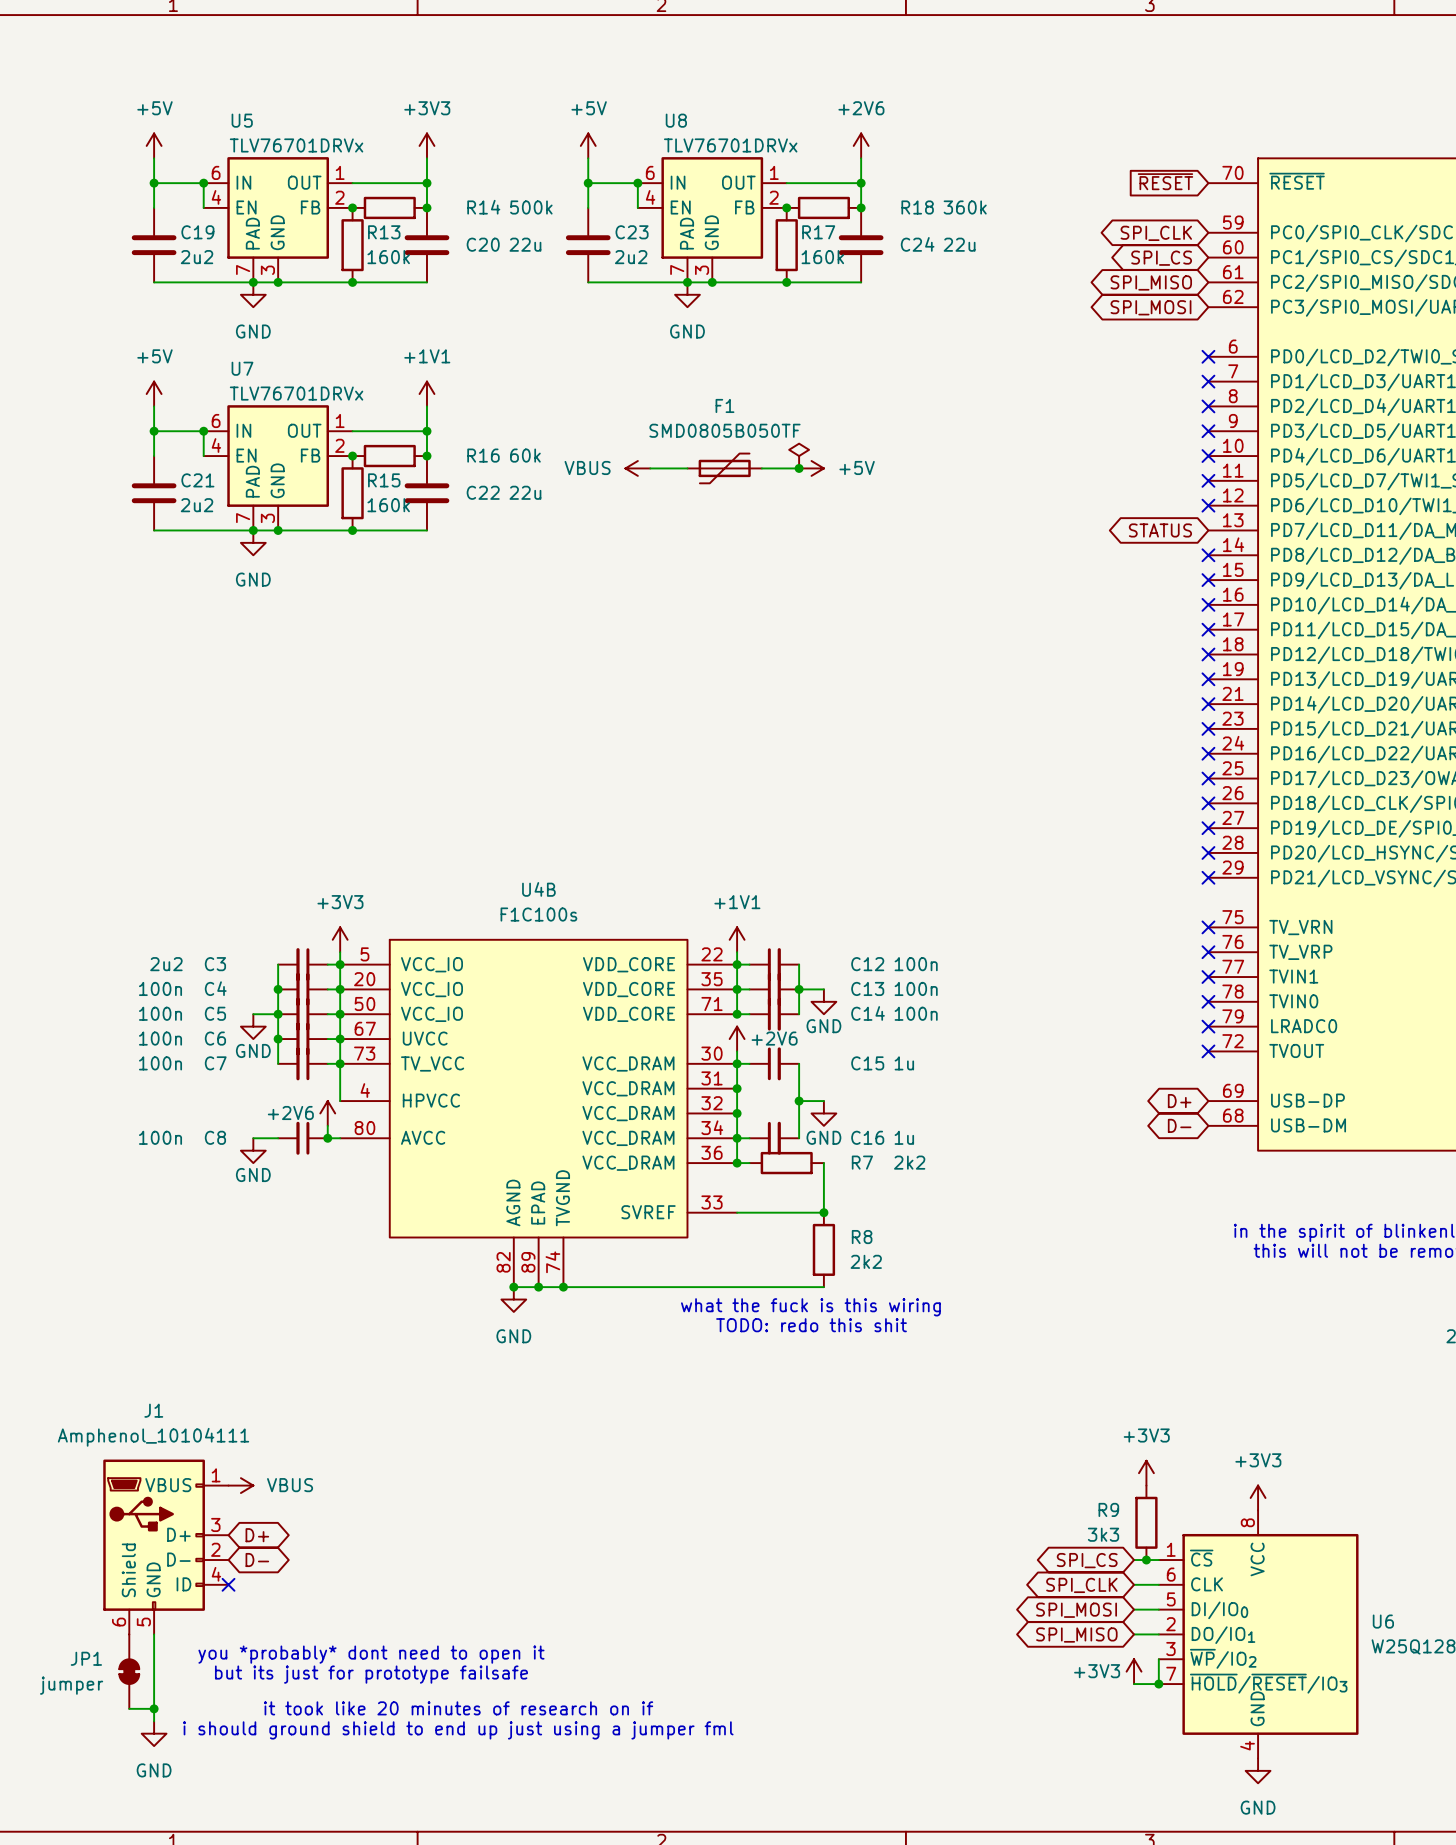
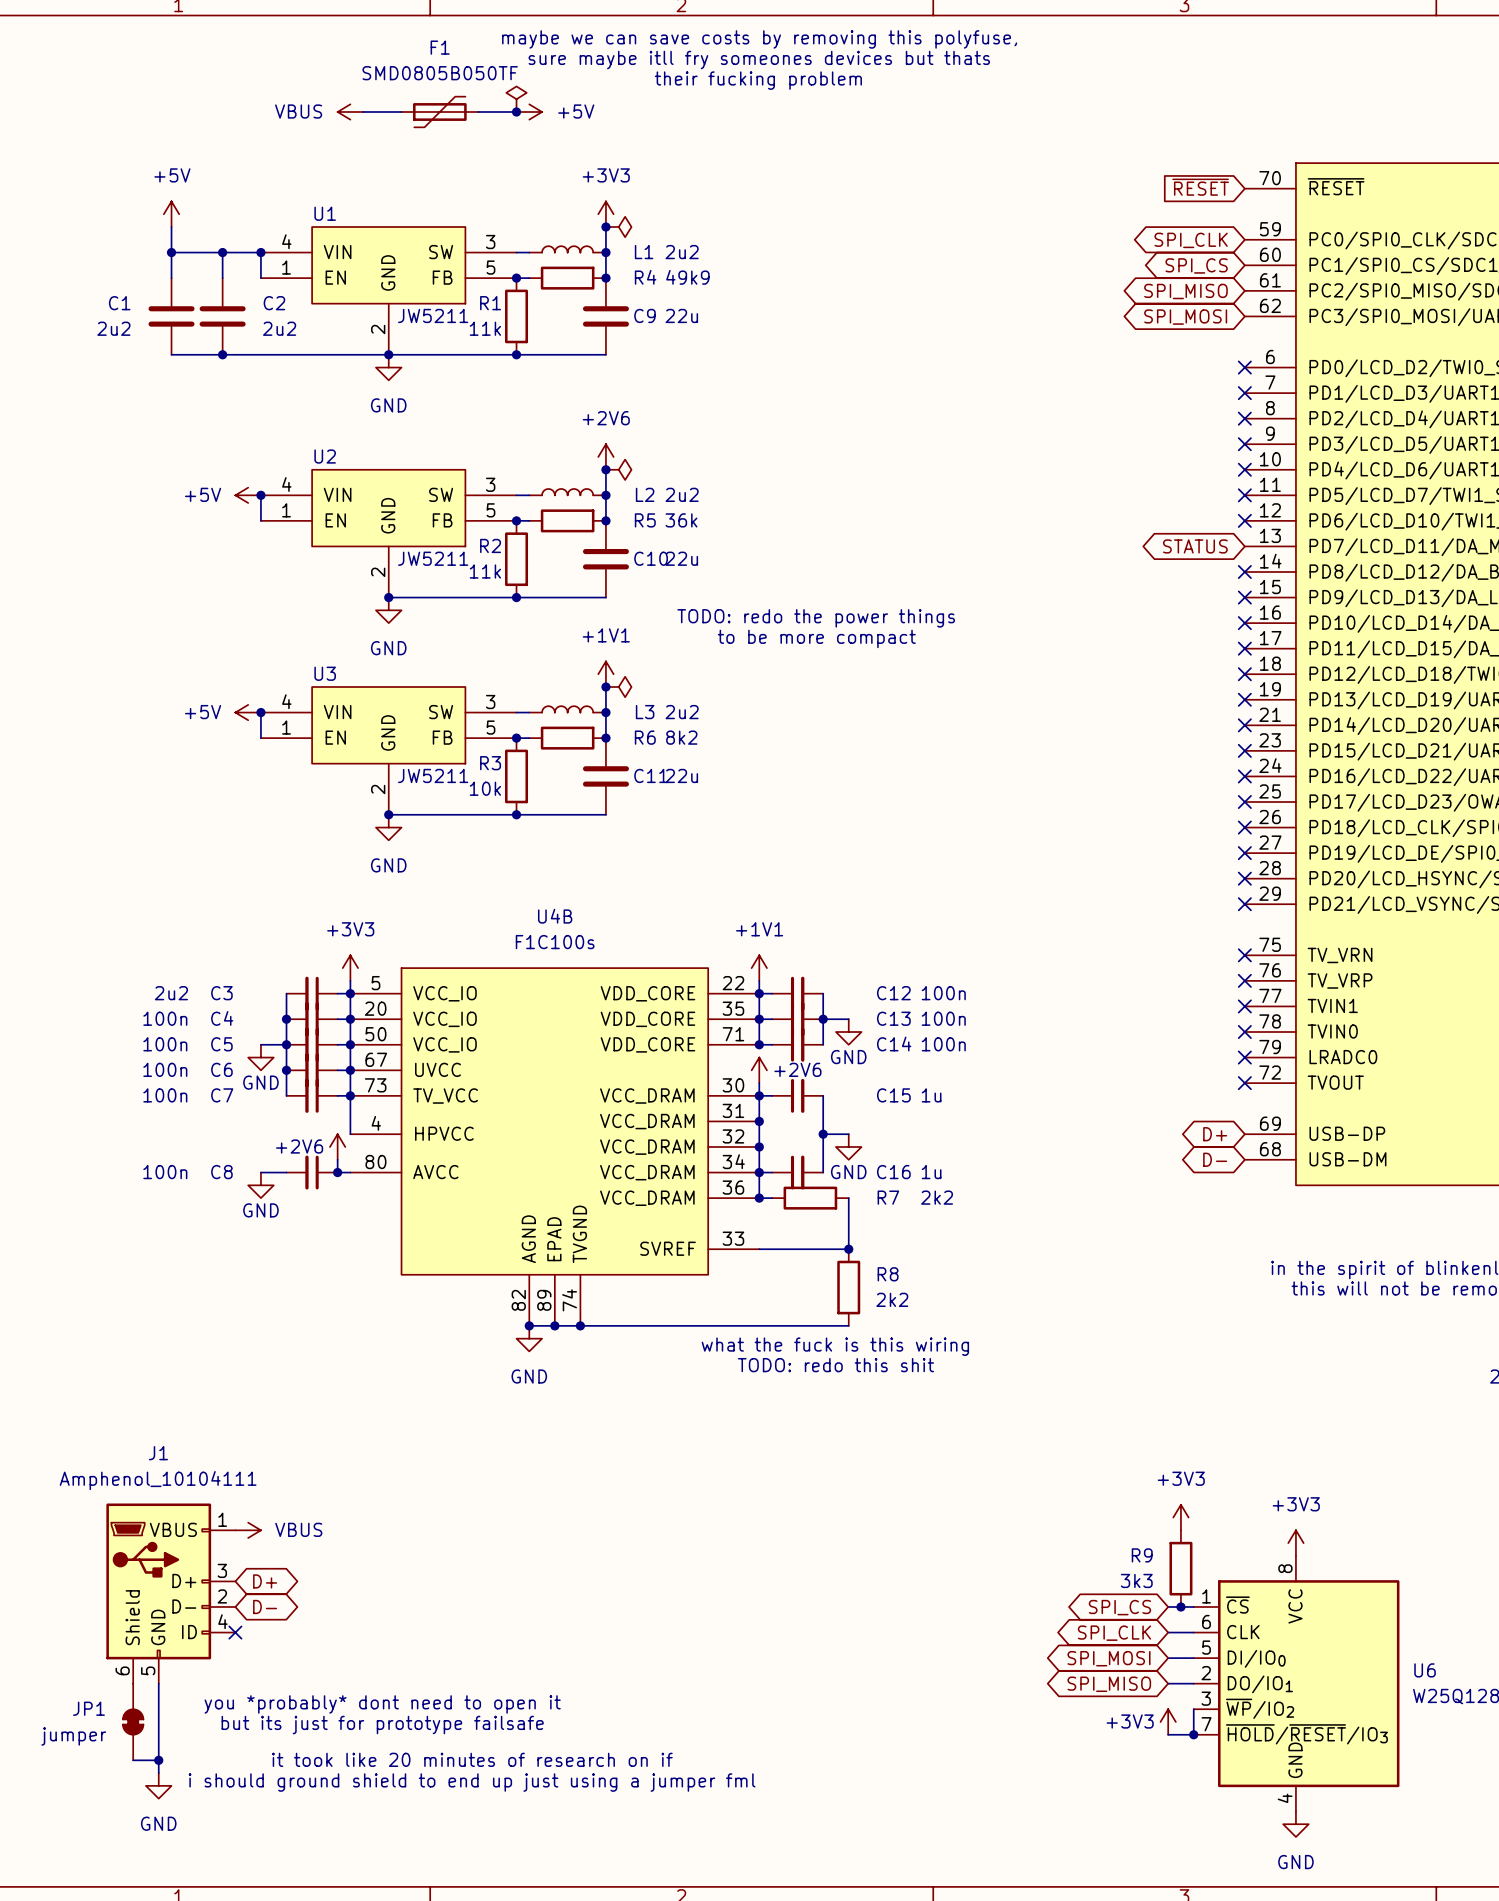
text: none -> maybe we can save costs by removing this polyfuse, (759, 39)
text: none -> sure maybe itll fry someones devices but thats (759, 60)
text: none -> their fucking problem (758, 80)
power symbol: none -> (516, 99)
power symbol: none -> VBUS (350, 112)
wire: none -> (363, 112) (401, 112)
wire: none -> (478, 112) (516, 112)
junction: none -> (516, 112)
power symbol position: +5V (154, 145) -> +5V (171, 214)
power symbol position: +3V3 (426, 145) -> +3V3 (605, 214)
power symbol rotation: 0° (588, 145) -> 90° clockwise (529, 112)
power symbol position: +5V (588, 145) -> +5V (529, 112)
power symbol: +2V6 (861, 145) -> none
wire: (154, 158) (154, 207) -> (171, 227) (171, 278)
wire: (426, 158) (426, 207) -> none
wire: (861, 158) (861, 207) -> none
wire: (154, 183) (203, 183) (203, 207) -> none
junction: (154, 183) -> none
junction: (203, 183) -> none
wire: (352, 183) (426, 183) -> none
junction: (426, 183) -> none
wire: (588, 183) (637, 183) (637, 207) -> none
junction: (588, 183) -> none
junction: (637, 183) -> none
wire: (786, 183) (861, 183) -> none
junction: (861, 183) -> none
junction: (352, 207) -> none
R14: 500k (389, 207) -> none
junction: (426, 207) -> none
junction: (786, 207) -> none
R18: 360k (823, 207) -> none
junction: (861, 207) -> none
U5: TLV76701DRVx (278, 219) -> none
U8: TLV76701DRVx (712, 219) -> none
junction: none -> (605, 227)
power symbol: none -> (618, 227)
L1: none -> 2u2 (567, 249)
C19: 2u2 (154, 245) -> none
wire: none -> (171, 252) (260, 252) (260, 278)
junction: none -> (171, 252)
wire: none -> (222, 252) (222, 278)
junction: none -> (222, 252)
junction: none -> (260, 252)
R13: 160k (352, 245) -> none
C20: 22u (426, 245) -> none
wire: none -> (516, 252) (529, 252)
junction: none -> (605, 252)
C23: 2u2 (588, 245) -> none
R17: 160k (786, 245) -> none
C24: 22u (861, 245) -> none
wire: none -> (516, 278) (529, 278)
junction: none -> (516, 278)
R4: none -> 49k9 (567, 278)
junction: none -> (605, 278)
wire: (154, 282) (426, 282) -> none
junction: (253, 282) -> none
junction: (278, 282) -> none
junction: (352, 282) -> none
U1: none -> JW5211 (388, 290)
wire: (588, 282) (861, 282) -> none
junction: (687, 282) -> none
junction: (712, 282) -> none
junction: (786, 282) -> none
power symbol: GND (253, 294) -> none
power symbol: GND (687, 294) -> none
C1: none -> 2u2 (171, 316)
C2: none -> 2u2 (222, 316)
R1: none -> 11k (516, 316)
C9: none -> 22u (605, 316)
wire: none -> (171, 354) (605, 354)
junction: none -> (222, 354)
junction: none -> (388, 354)
junction: none -> (516, 354)
power symbol: none -> GND (388, 367)
power symbol: +5V (154, 394) -> none
power symbol: +1V1 (426, 394) -> none
wire: (154, 406) (154, 456) -> none
wire: (426, 406) (426, 456) -> (605, 469) (605, 520)
wire: (154, 431) (203, 431) (203, 456) -> none
junction: (154, 431) -> none
junction: (203, 431) -> none
wire: (352, 431) (426, 431) -> none
junction: (426, 431) -> none
power symbol: none -> +2V6 (605, 456)
junction: (352, 456) -> none
R16: 60k (389, 456) -> none
junction: (426, 456) -> none
junction: none -> (605, 469)
power symbol: none -> (618, 469)
power symbol: (799, 456) -> none
U7: TLV76701DRVx (278, 467) -> none
power symbol: VBUS (637, 468) -> none
wire: (650, 468) (687, 468) -> none
F1 position: (724, 468) -> (439, 112)
wire: (761, 468) (799, 468) -> none
junction: (799, 468) -> none
power symbol: +5V (811, 468) -> none
L2: none -> 2u2 (567, 492)
power symbol: none -> +5V (248, 495)
junction: none -> (260, 495)
wire: none -> (516, 495) (529, 495)
junction: none -> (605, 495)
C21: 2u2 (154, 493) -> none
R15: 160k (352, 493) -> none
C22: 22u (426, 493) -> none
wire: none -> (516, 520) (529, 520)
junction: none -> (516, 520)
R5: none -> 36k (567, 520)
junction: none -> (605, 520)
U2: none -> JW5211 (388, 533)
wire: (154, 530) (426, 530) -> none
junction: (253, 530) -> none
junction: (278, 530) -> none
junction: (352, 530) -> none
power symbol: GND (253, 542) -> none
R2: none -> 11k (516, 559)
C10: none -> 22u (605, 559)
wire: none -> (388, 597) (605, 597)
junction: none -> (388, 597)
junction: none -> (516, 597)
power symbol: none -> GND (388, 610)
text: none -> TODO: redo the power things (816, 618)
text: none -> to be more compact (816, 638)
power symbol: none -> +1V1 (605, 674)
wire: none -> (605, 686) (605, 738)
junction: none -> (605, 686)
power symbol: none -> (618, 686)
L3: none -> 2u2 (567, 709)
power symbol: none -> +5V (248, 712)
wire: none -> (260, 712) (260, 738)
junction: none -> (260, 712)
wire: none -> (516, 712) (529, 712)
junction: none -> (605, 712)
wire: none -> (516, 738) (529, 738)
junction: none -> (516, 738)
R6: none -> 8k2 (567, 738)
junction: none -> (605, 738)
U3: none -> JW5211 (388, 750)
R3: none -> 10k (516, 776)
C11: none -> 22u (605, 776)
wire: none -> (388, 814) (605, 814)
junction: none -> (388, 814)
junction: none -> (516, 814)
power symbol: none -> GND (388, 827)

